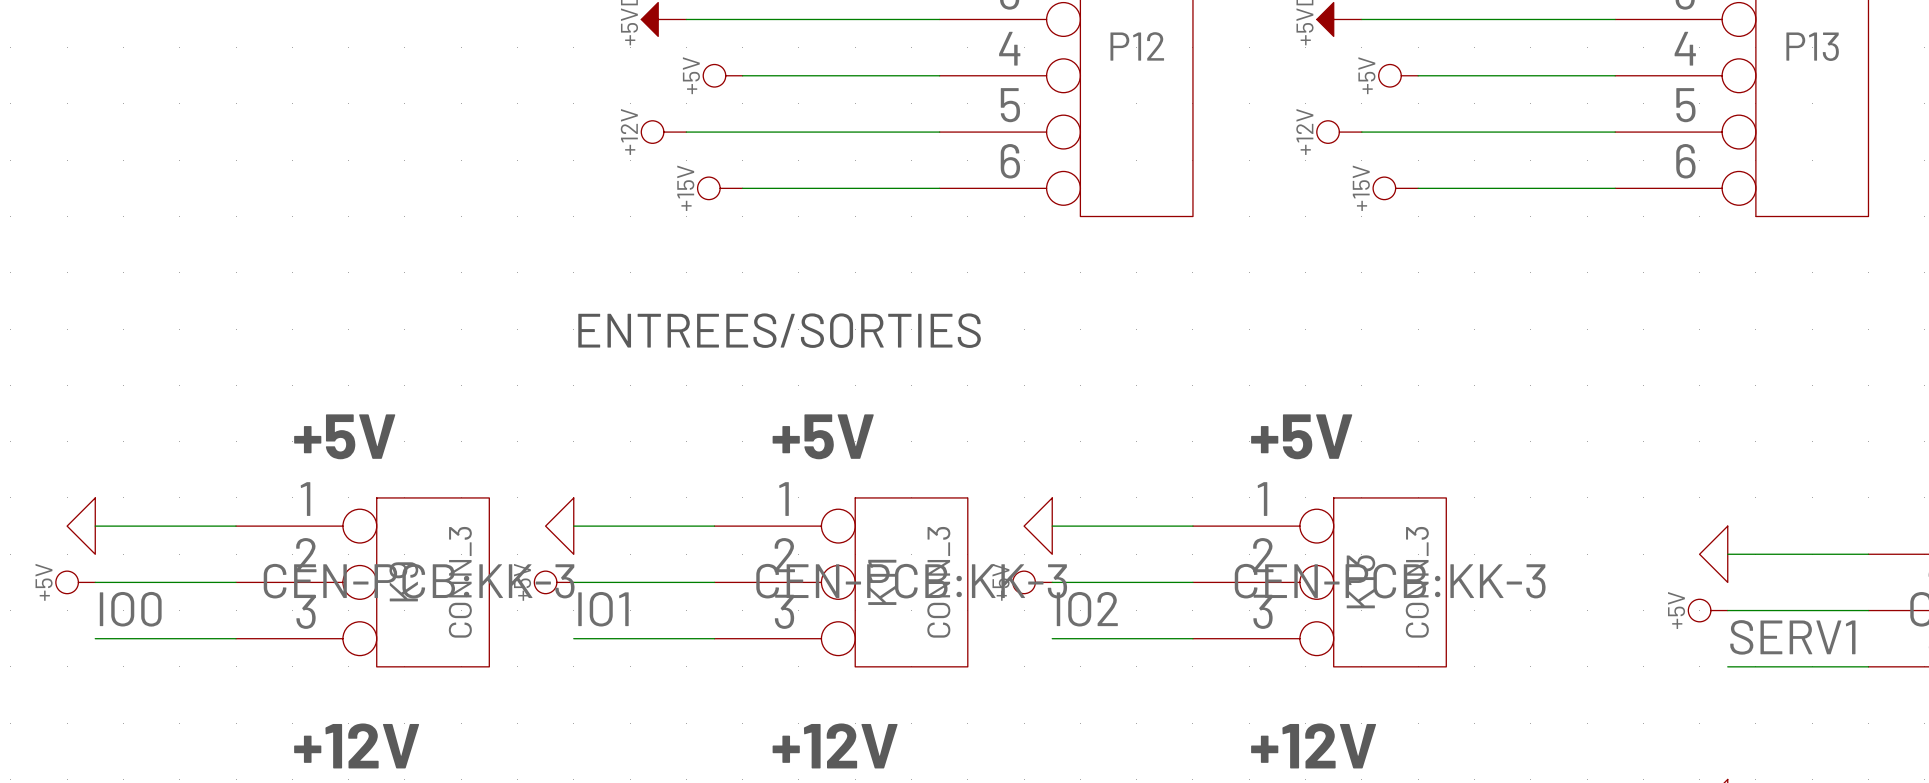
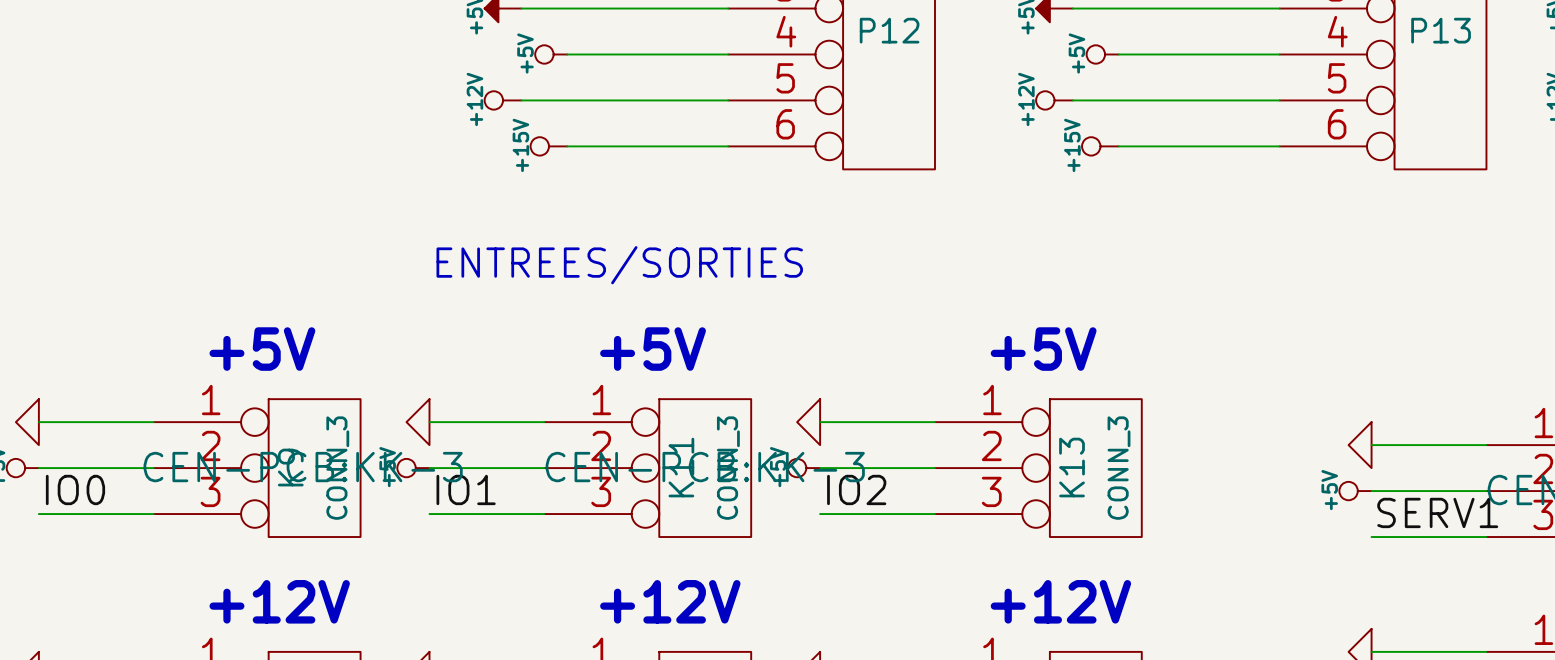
K13 text: CEN-PCB:KK-3 (1390, 581) -> none

